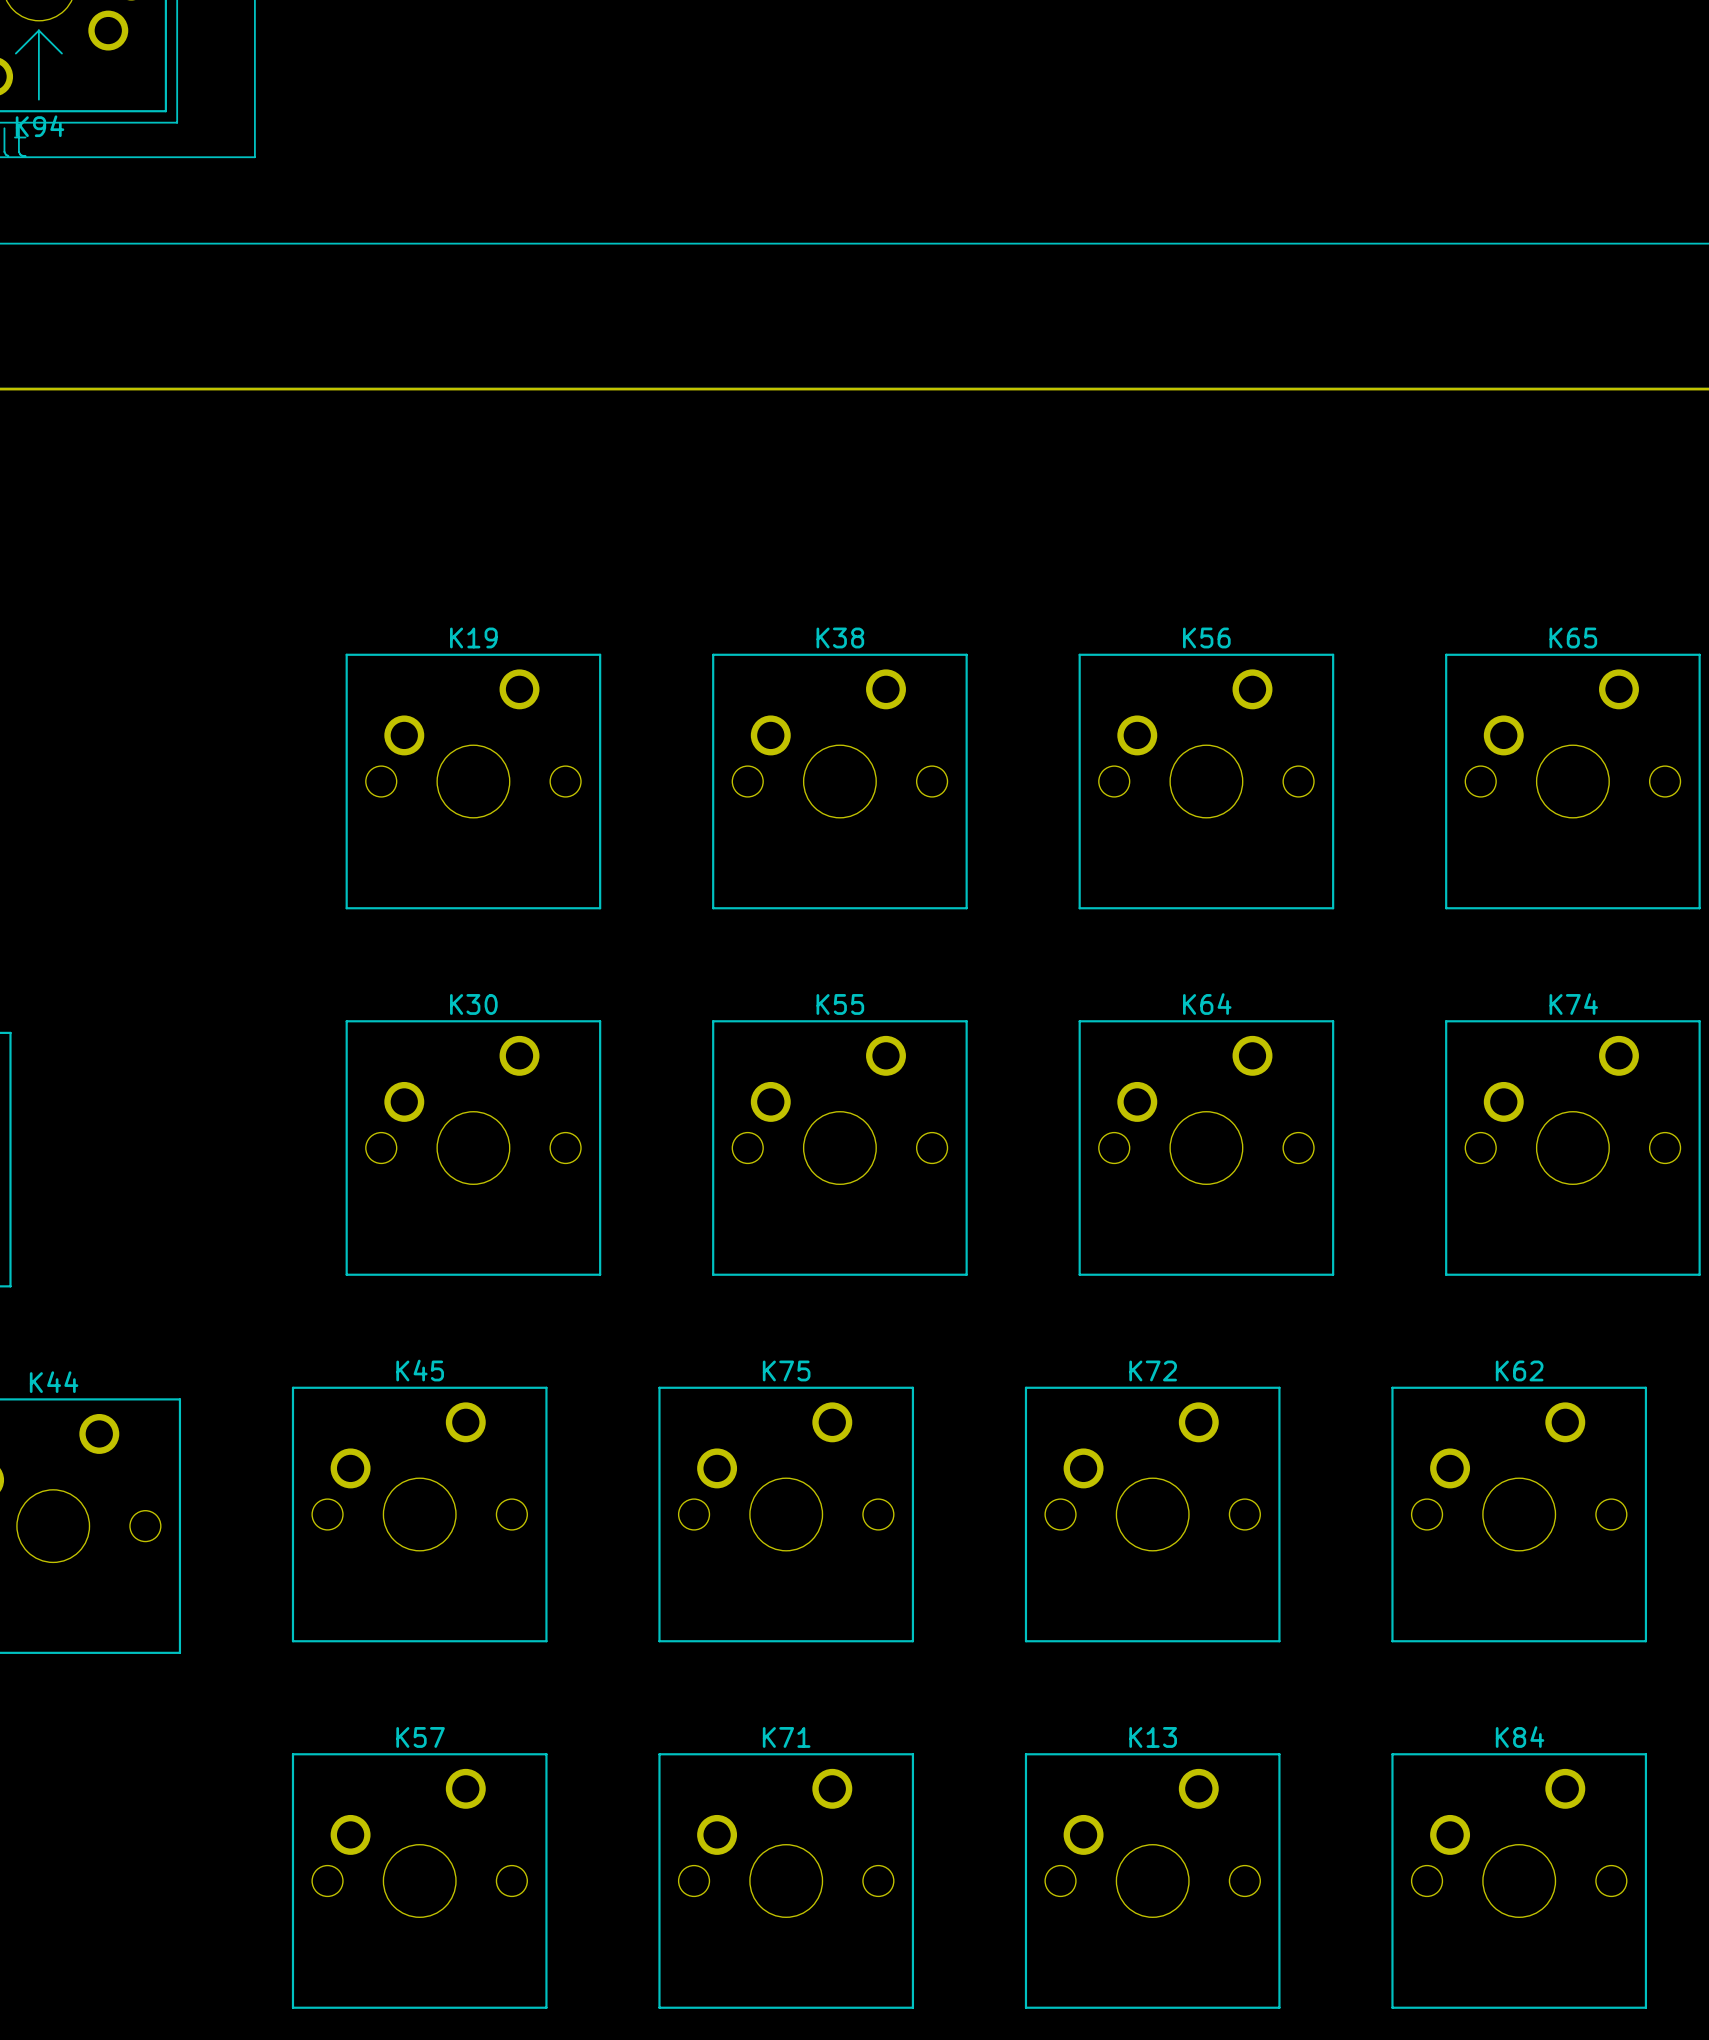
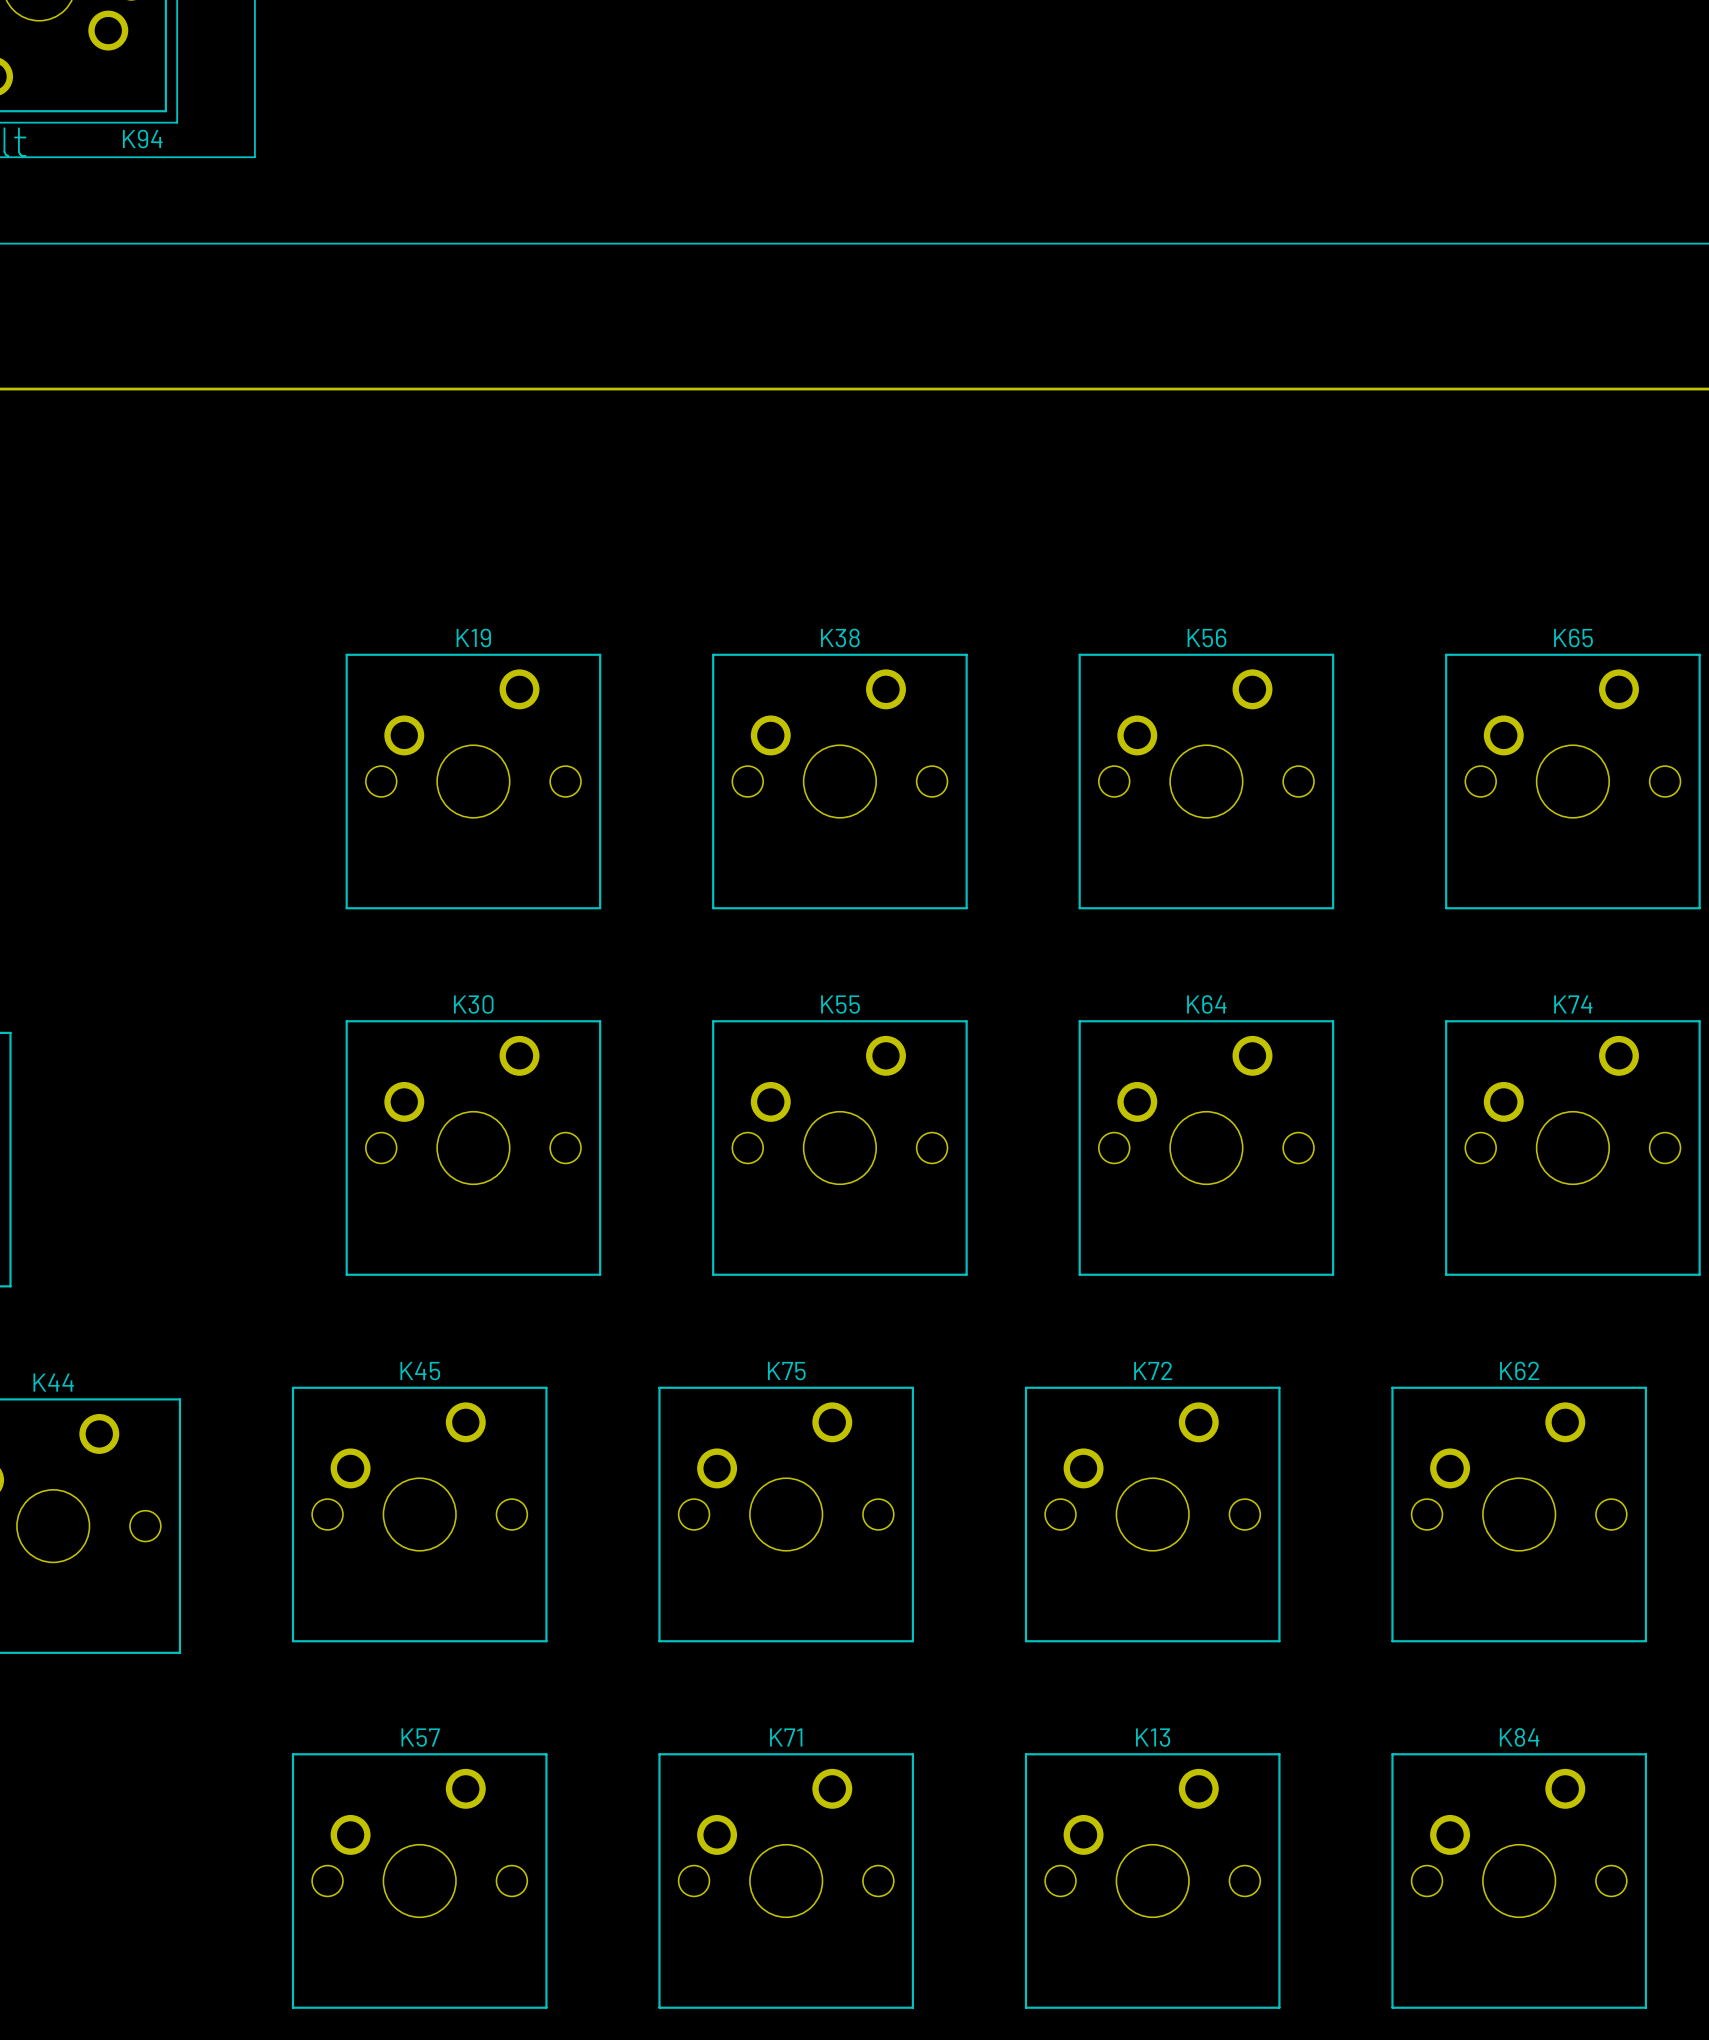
line: (38, 30) (38, 99) -> none
line: (38, 30) (15, 53) -> none
line: (38, 30) (61, 53) -> none
K94 name position: K94 (40, 126) -> K94 (142, 139)

